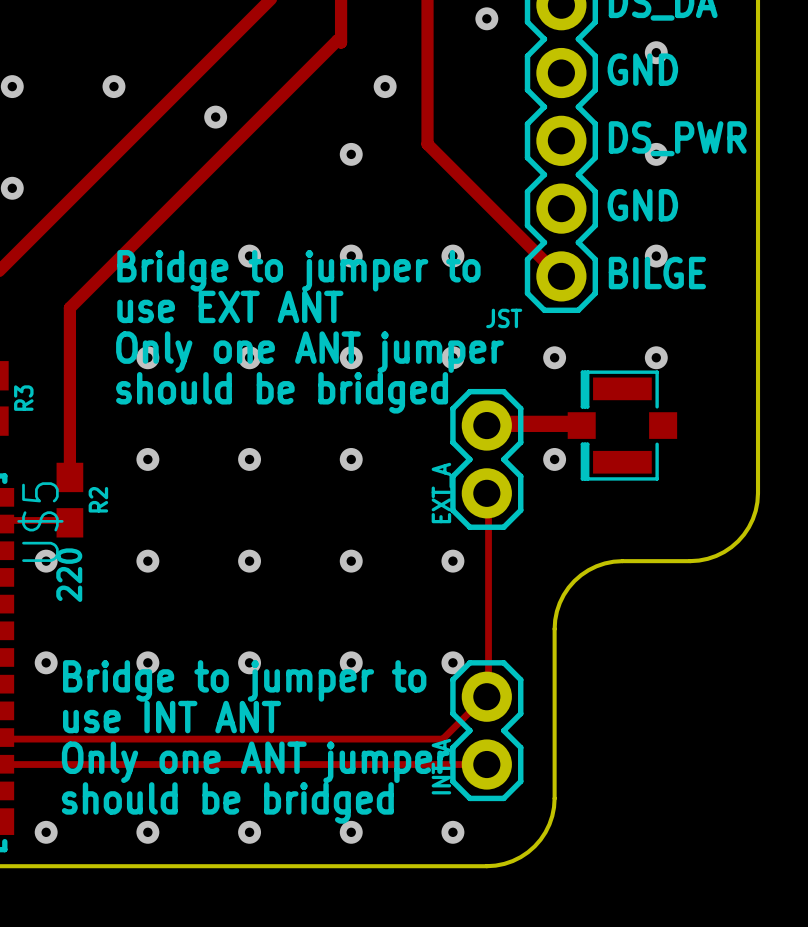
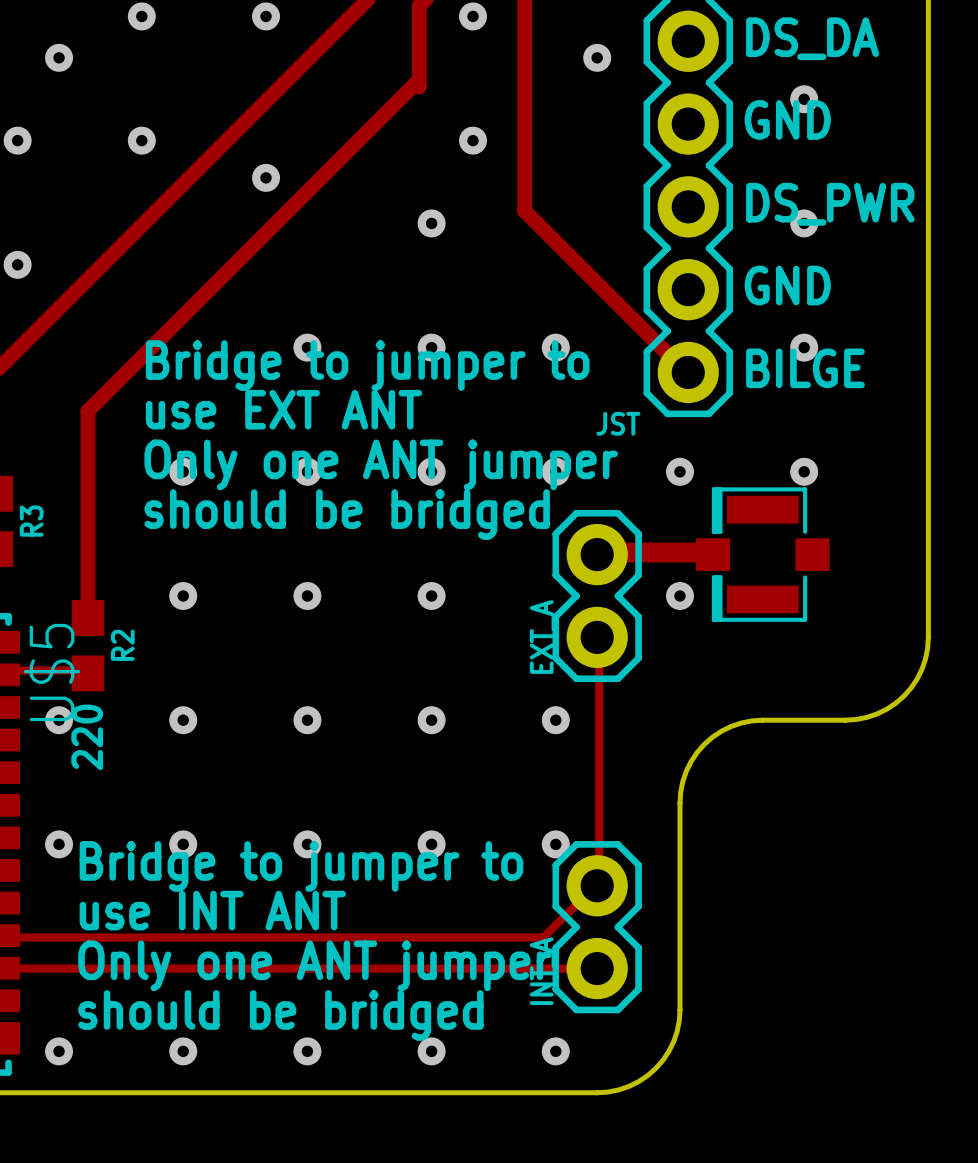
via: none -> (59, 57)

